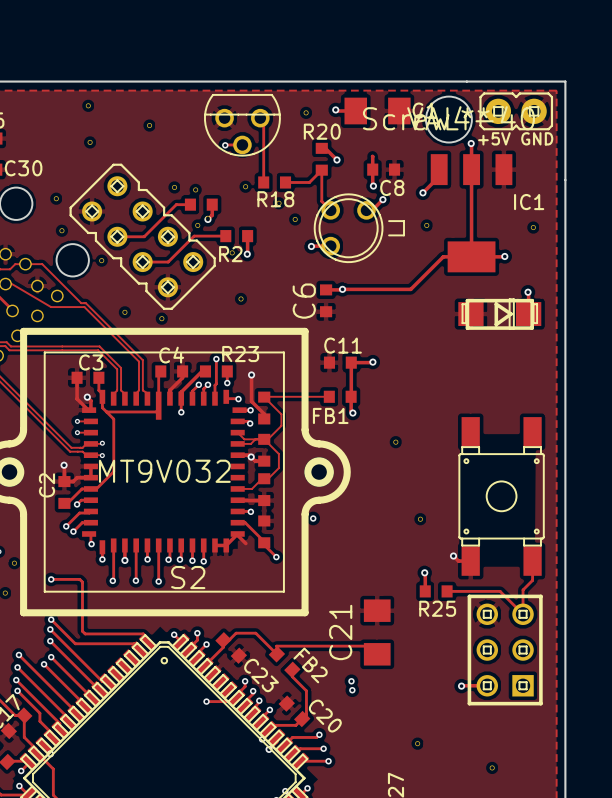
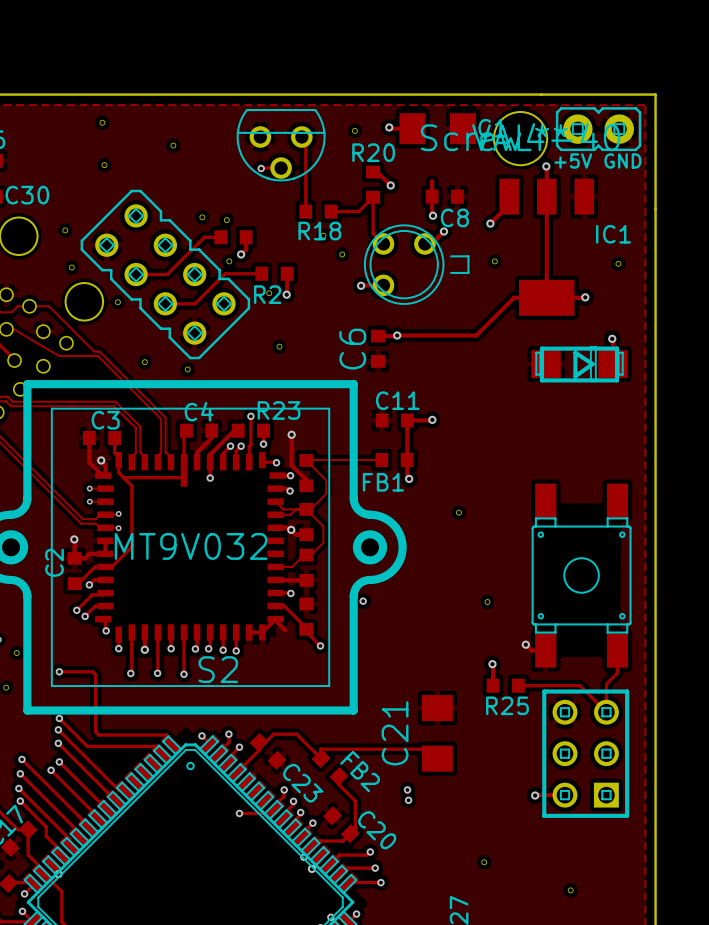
part: (245, 186) -> none
part: (207, 218) -> none

